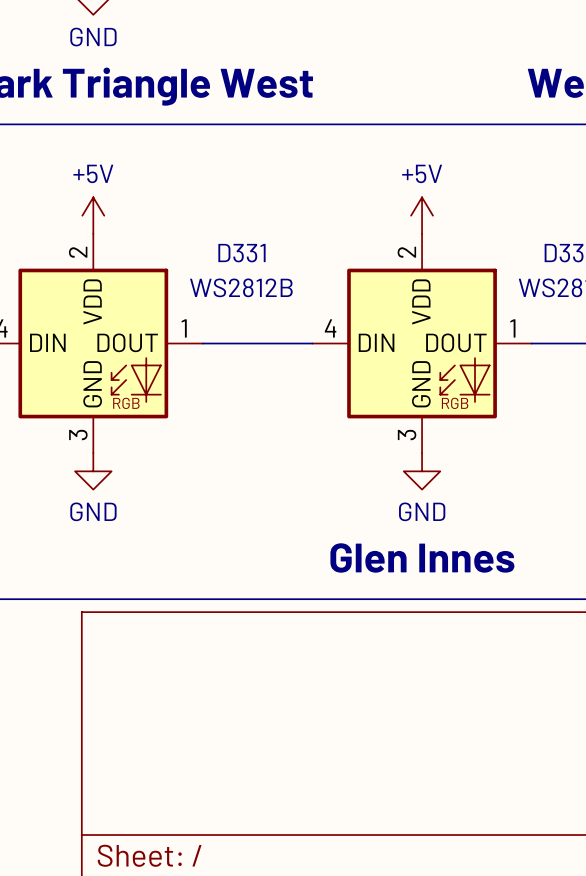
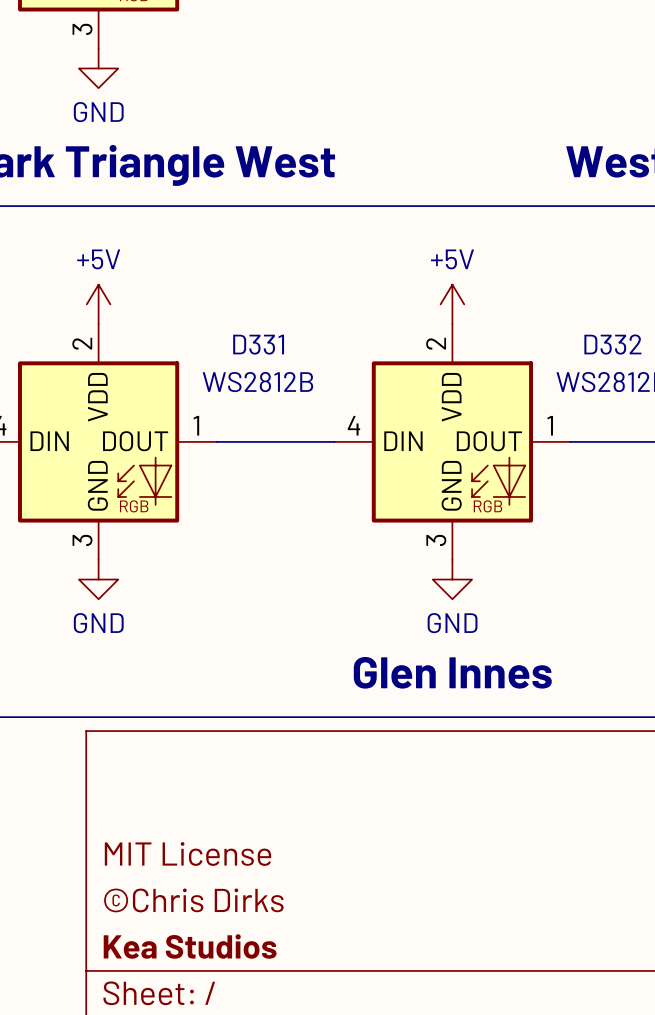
title block: none -> MIT License (188, 853)
title block: none -> ©Chris Dirks (193, 900)
title block: none -> Kea Studios (190, 946)

